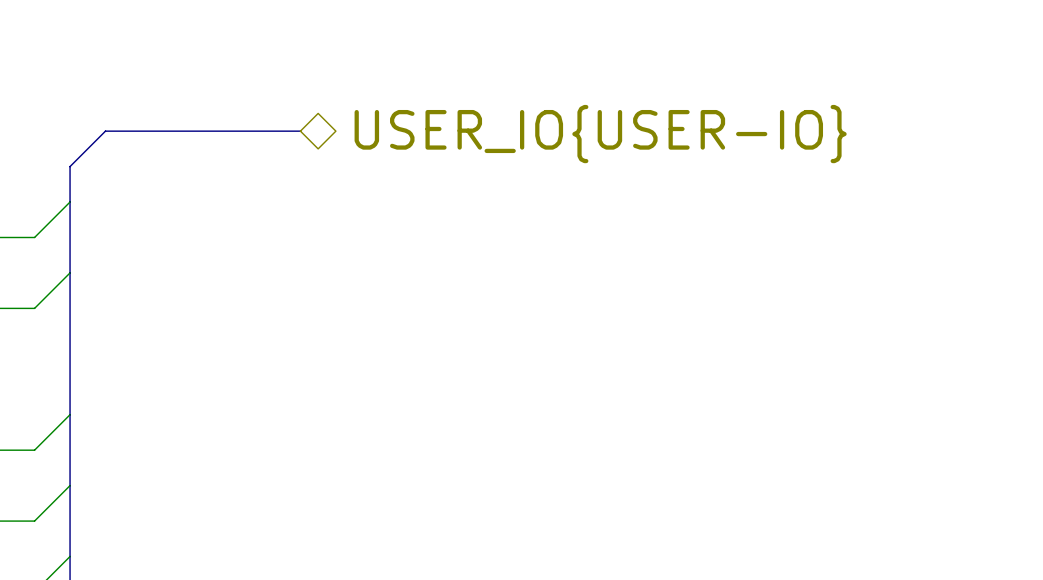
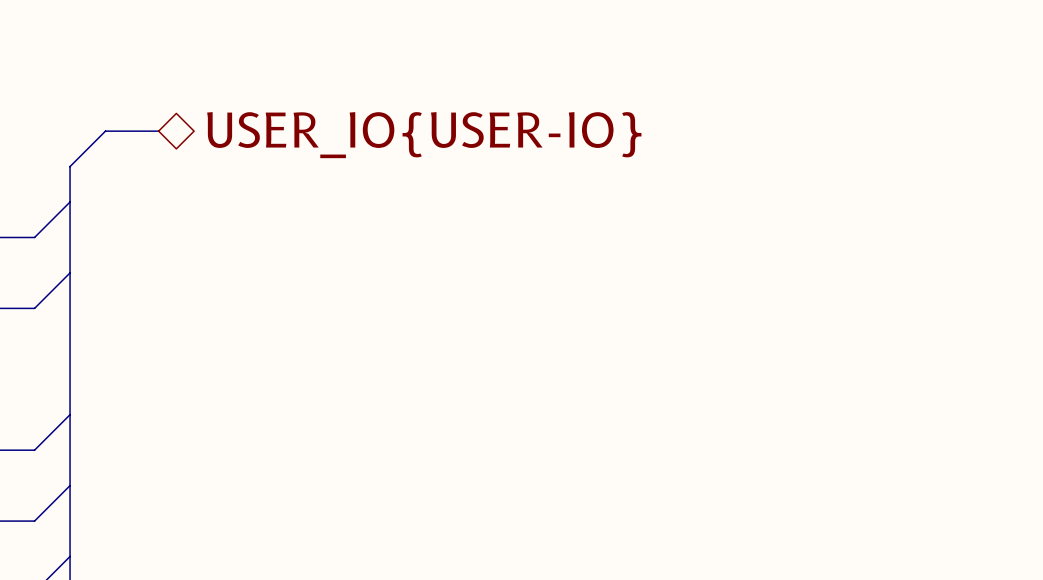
bus: (158, 131) (300, 131) -> none
hierarchical label position: USER_IO{USER-IO} (600, 134) -> USER_IO{USER-IO} (424, 135)

